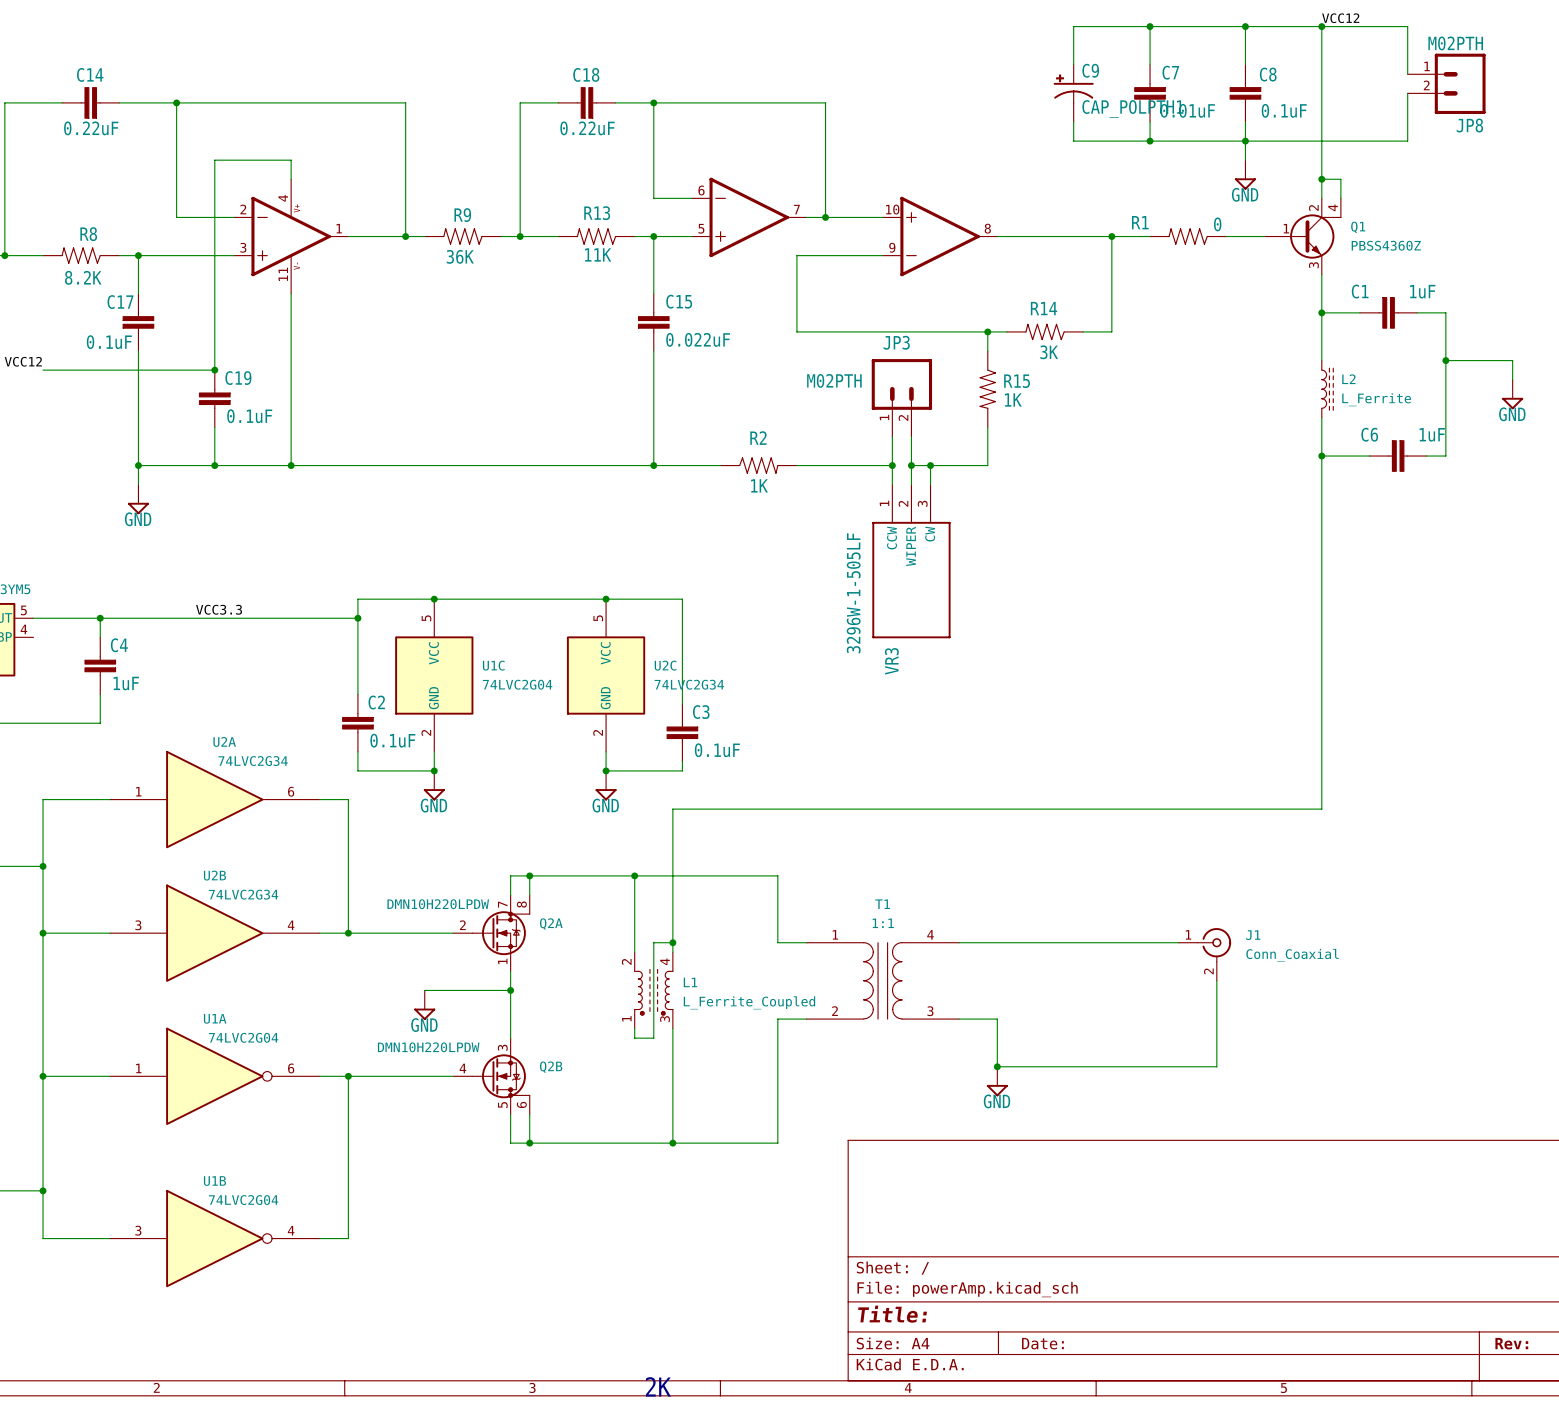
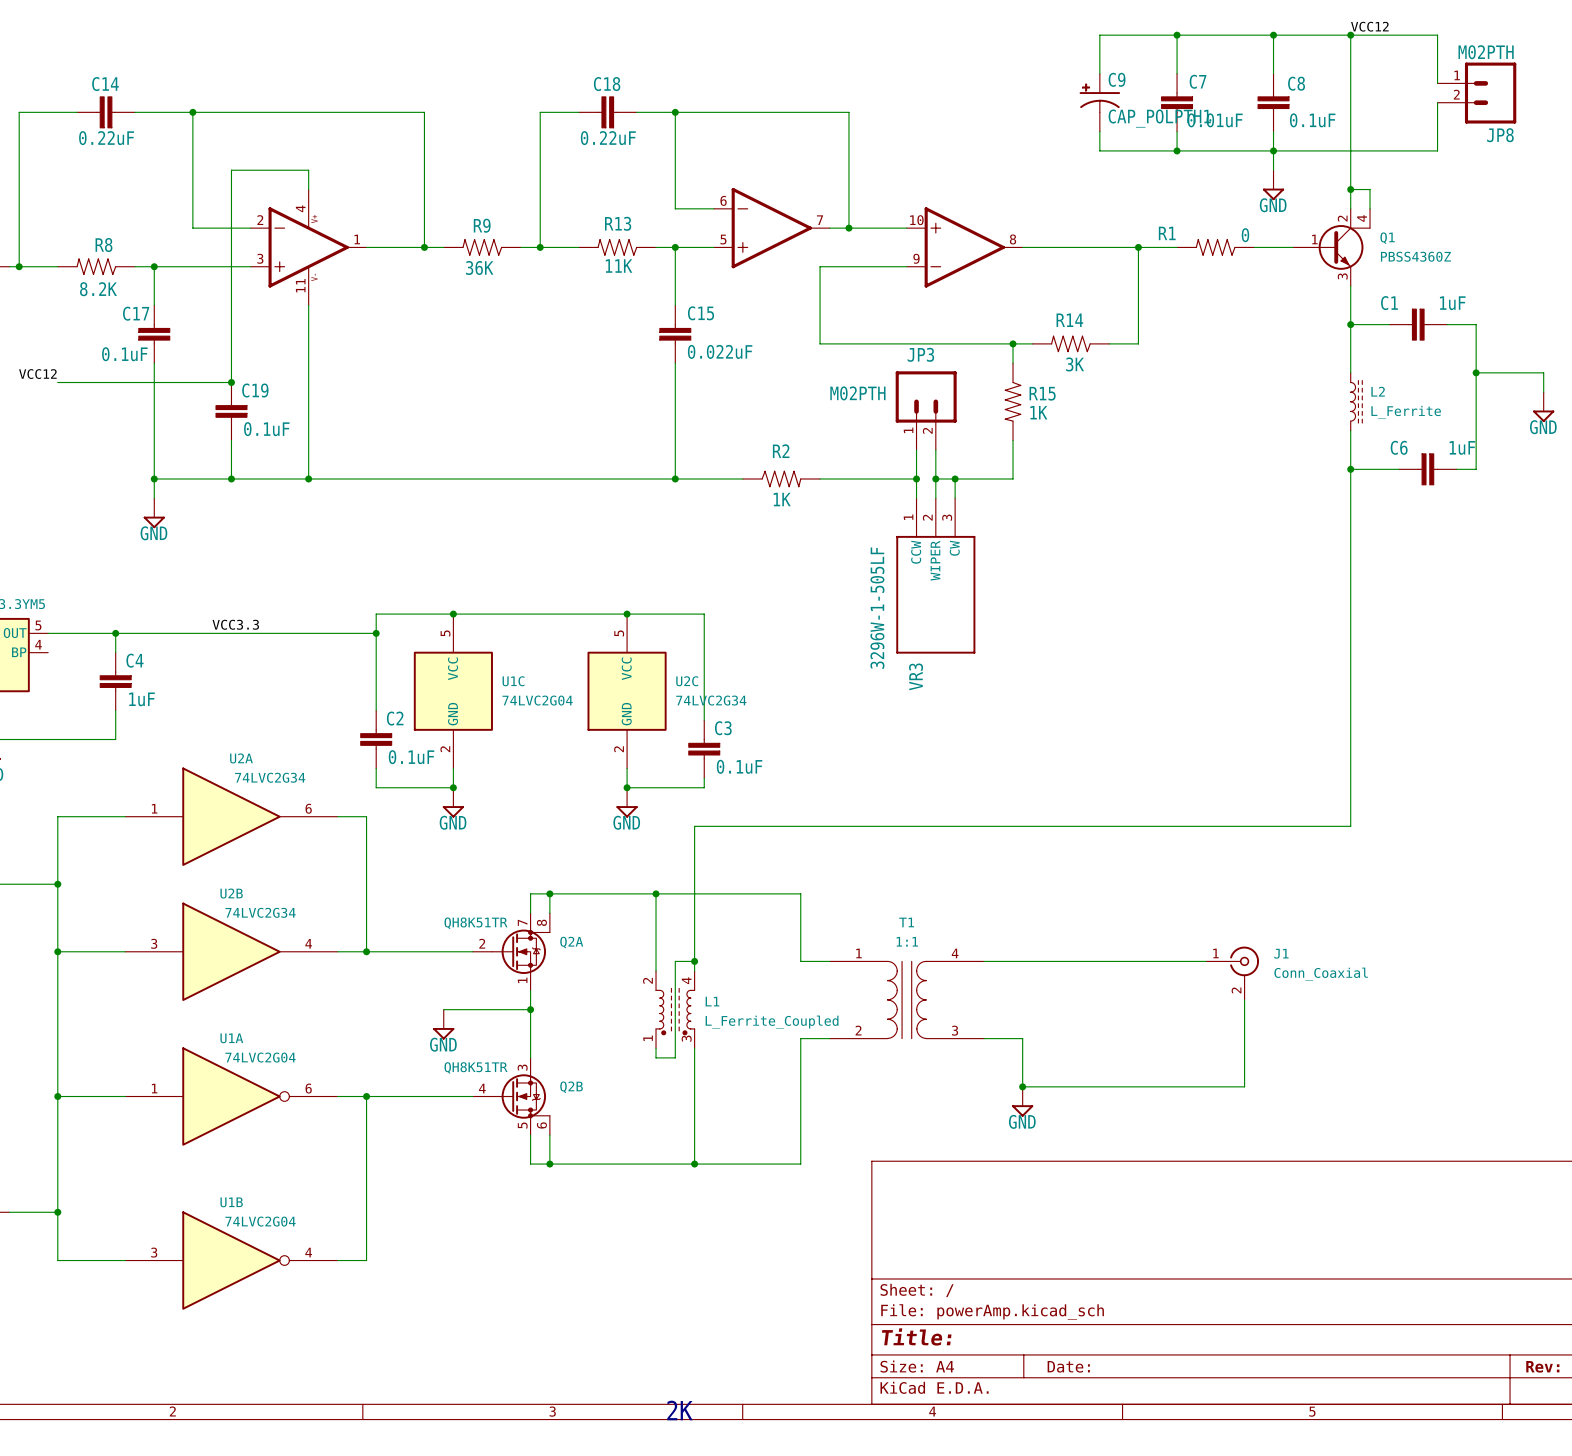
Q2A value: DMN10H220LPDW (438, 904) -> QH8K51TR (475, 923)
Q2B value: DMN10H220LPDW (428, 1047) -> QH8K51TR (475, 1067)

